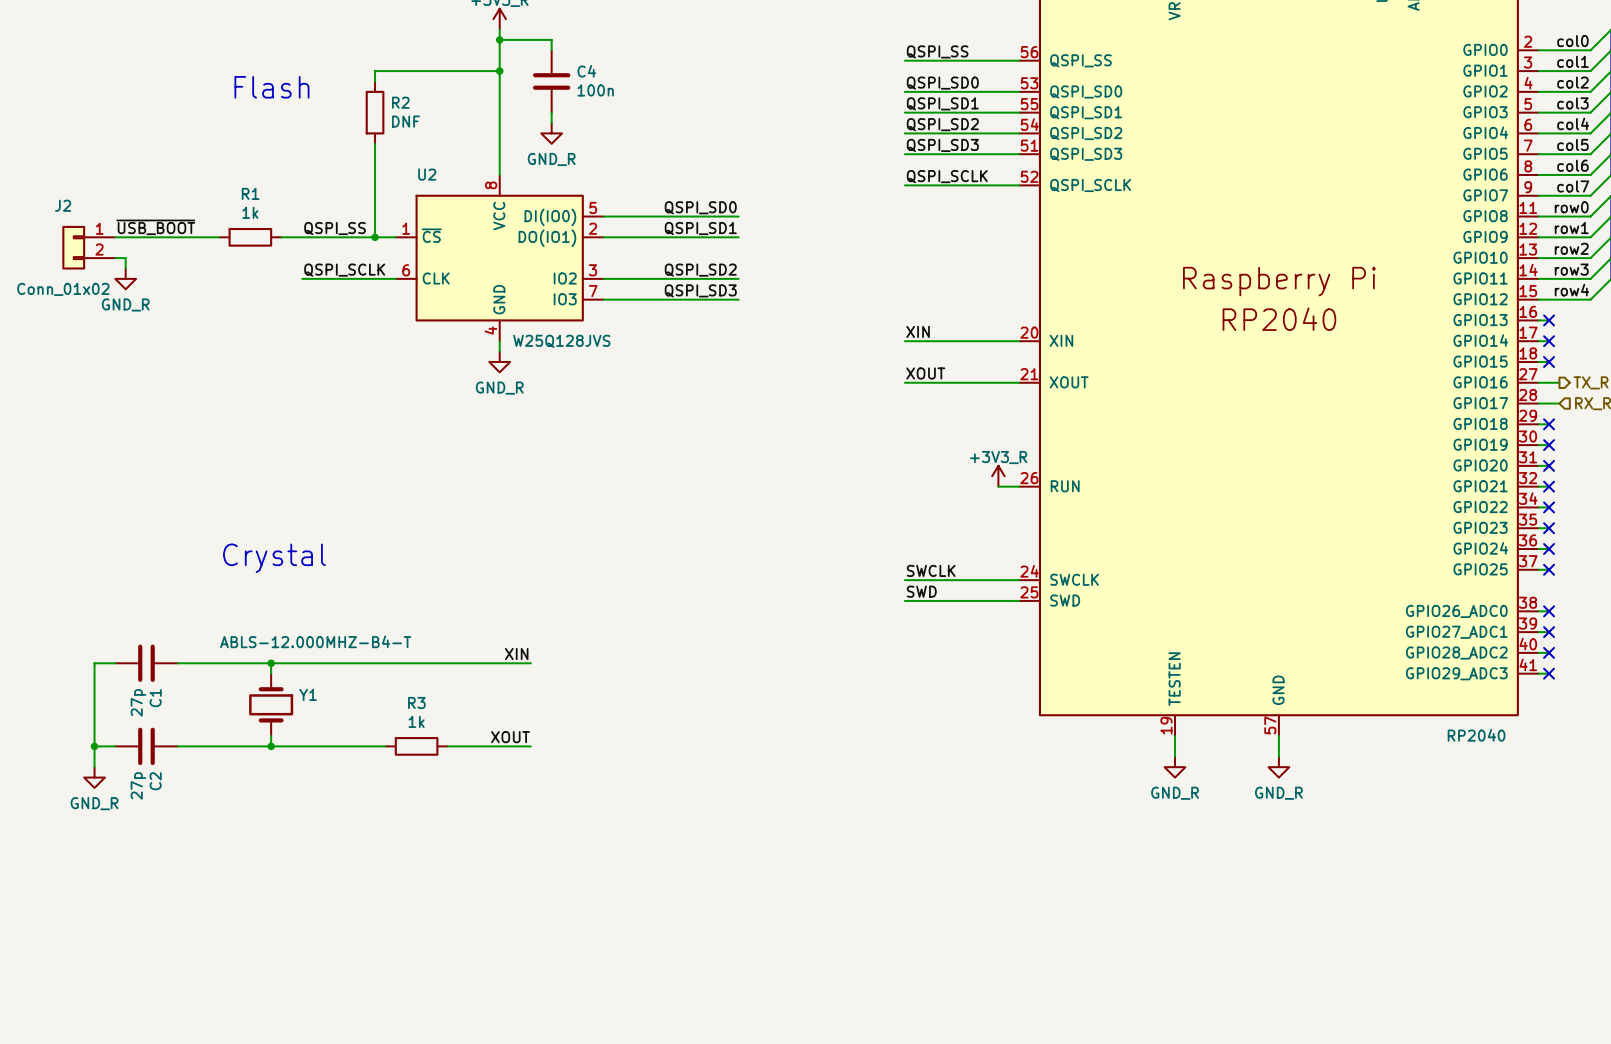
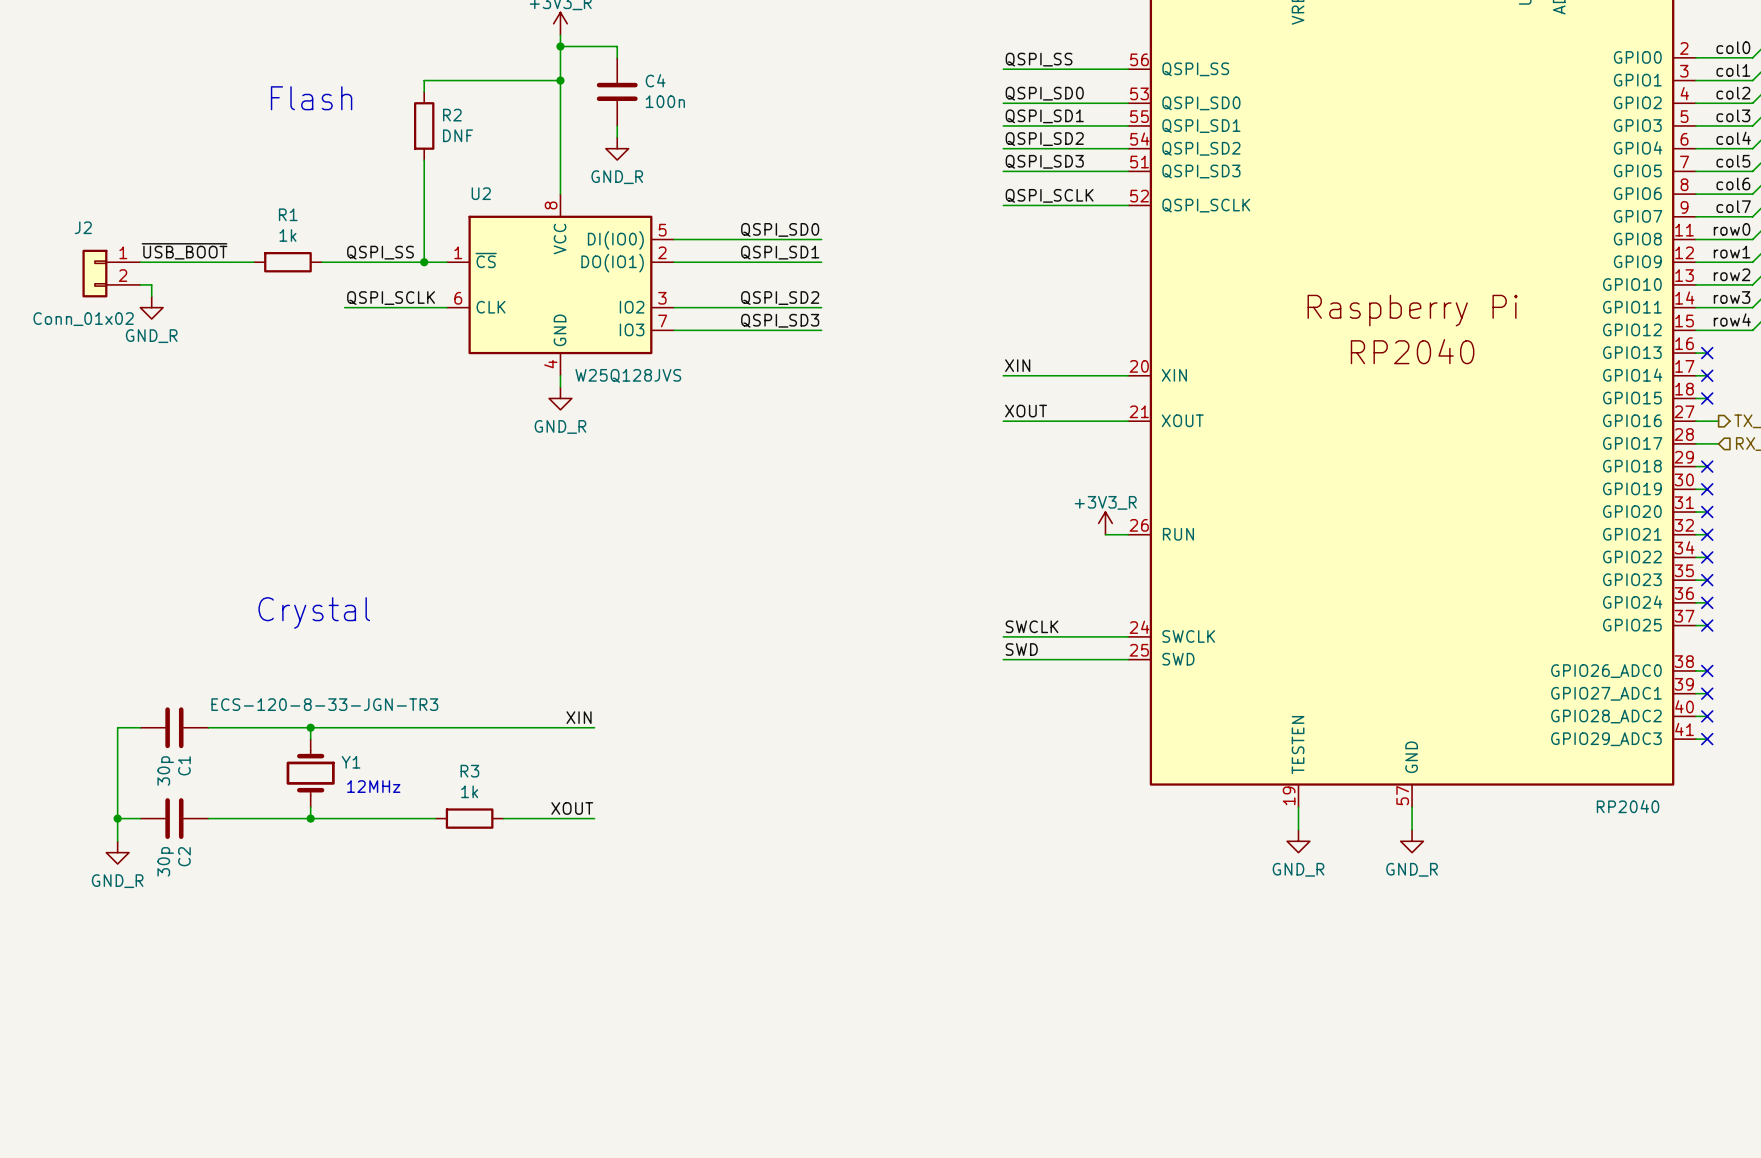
Y1 value: ABLS-12.000MHZ-B4-T (315, 641) -> ECS-120-8-33-JGN-TR3 (324, 704)
C1 value: 27p (138, 702) -> 30p (165, 770)
text: none -> 12MHz (373, 786)
C2 value: 27p (138, 785) -> 30p (165, 861)

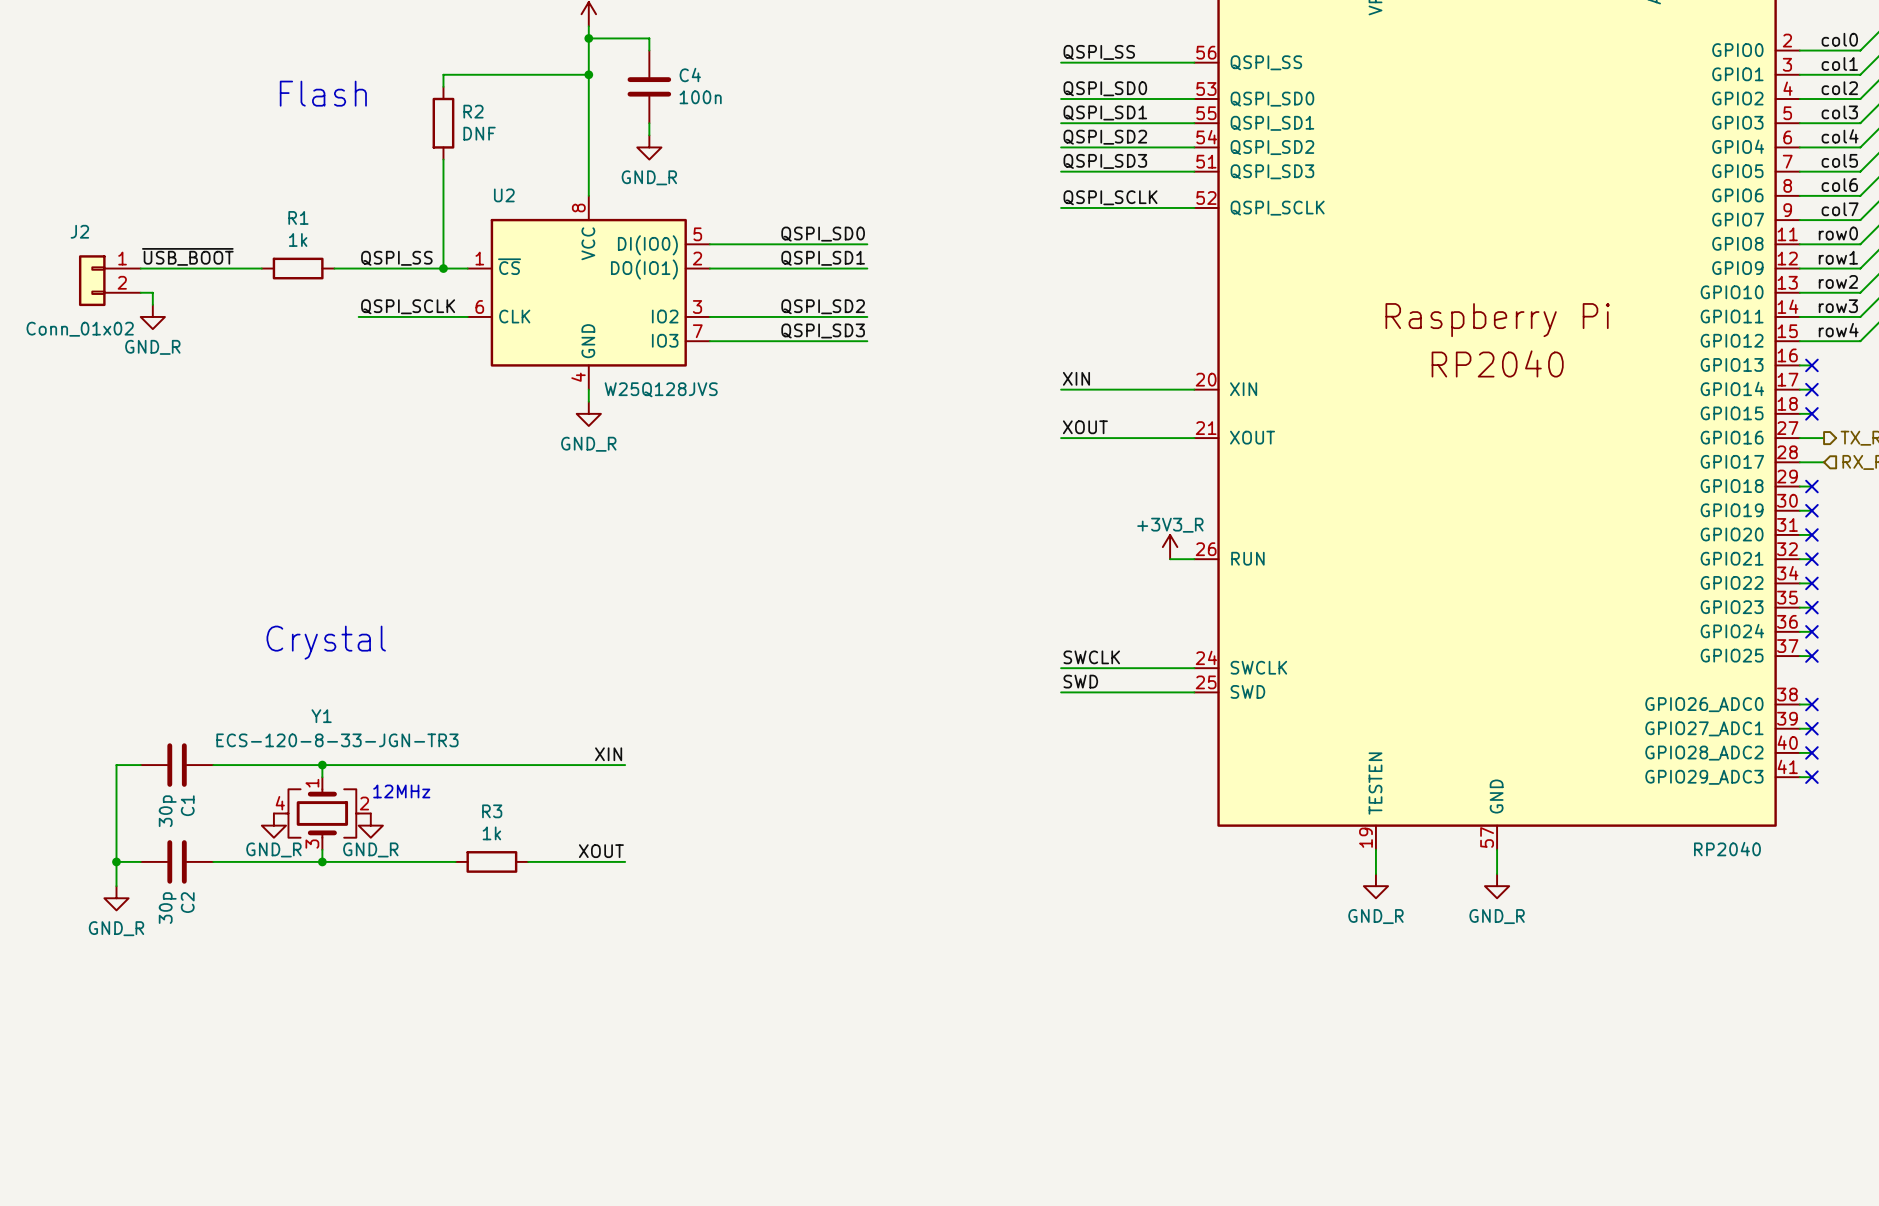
Y1 symbol: [286, 739, 335, 808] -> [273, 777, 371, 850]
Y1 name position: Y1 (351, 762) -> Y1 (321, 716)
power symbol: none -> GND_R (273, 825)
power symbol: none -> GND_R (370, 825)
text position: 12MHz (373, 786) -> 12MHz (401, 791)

